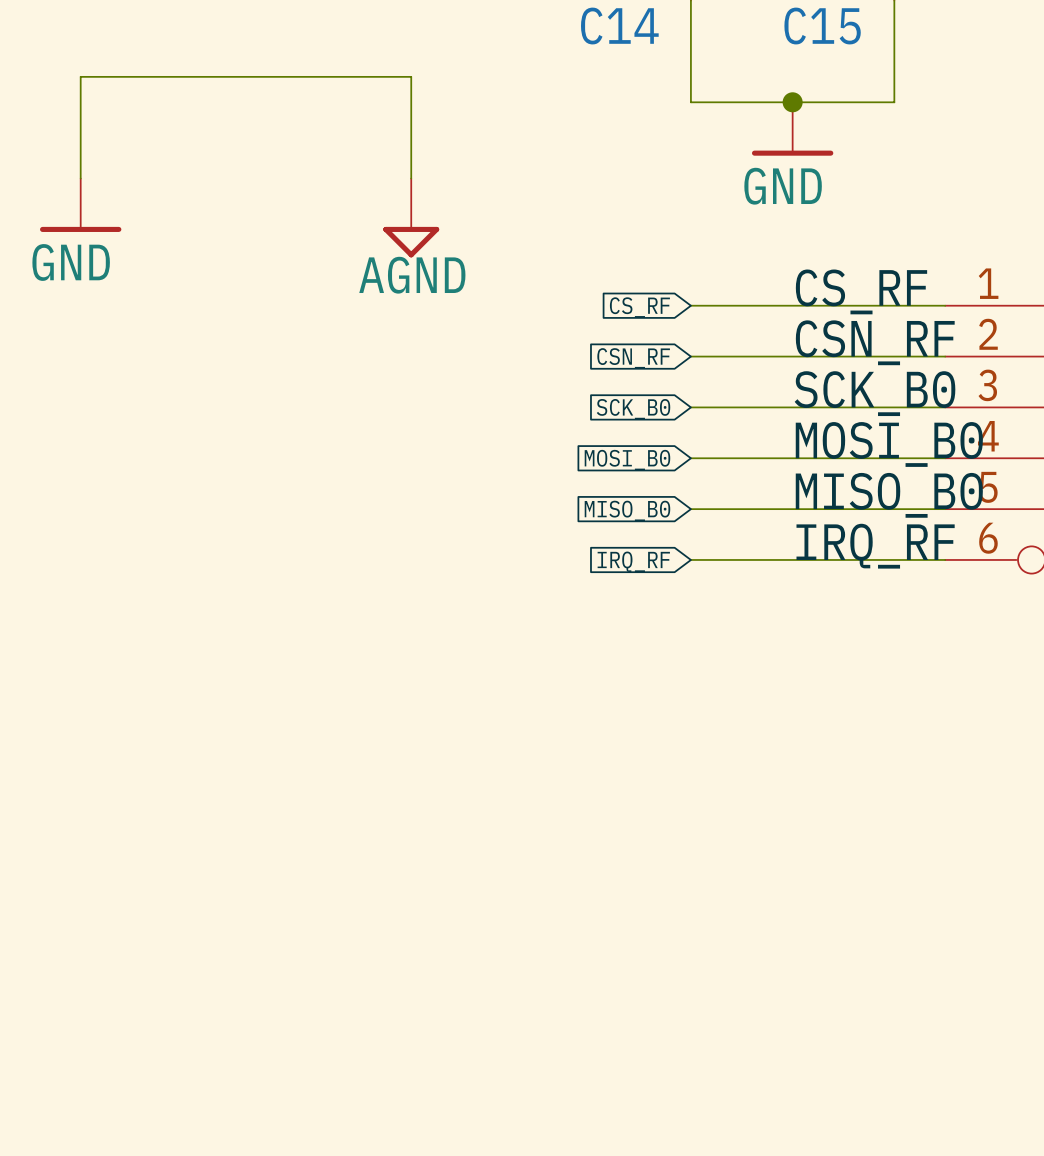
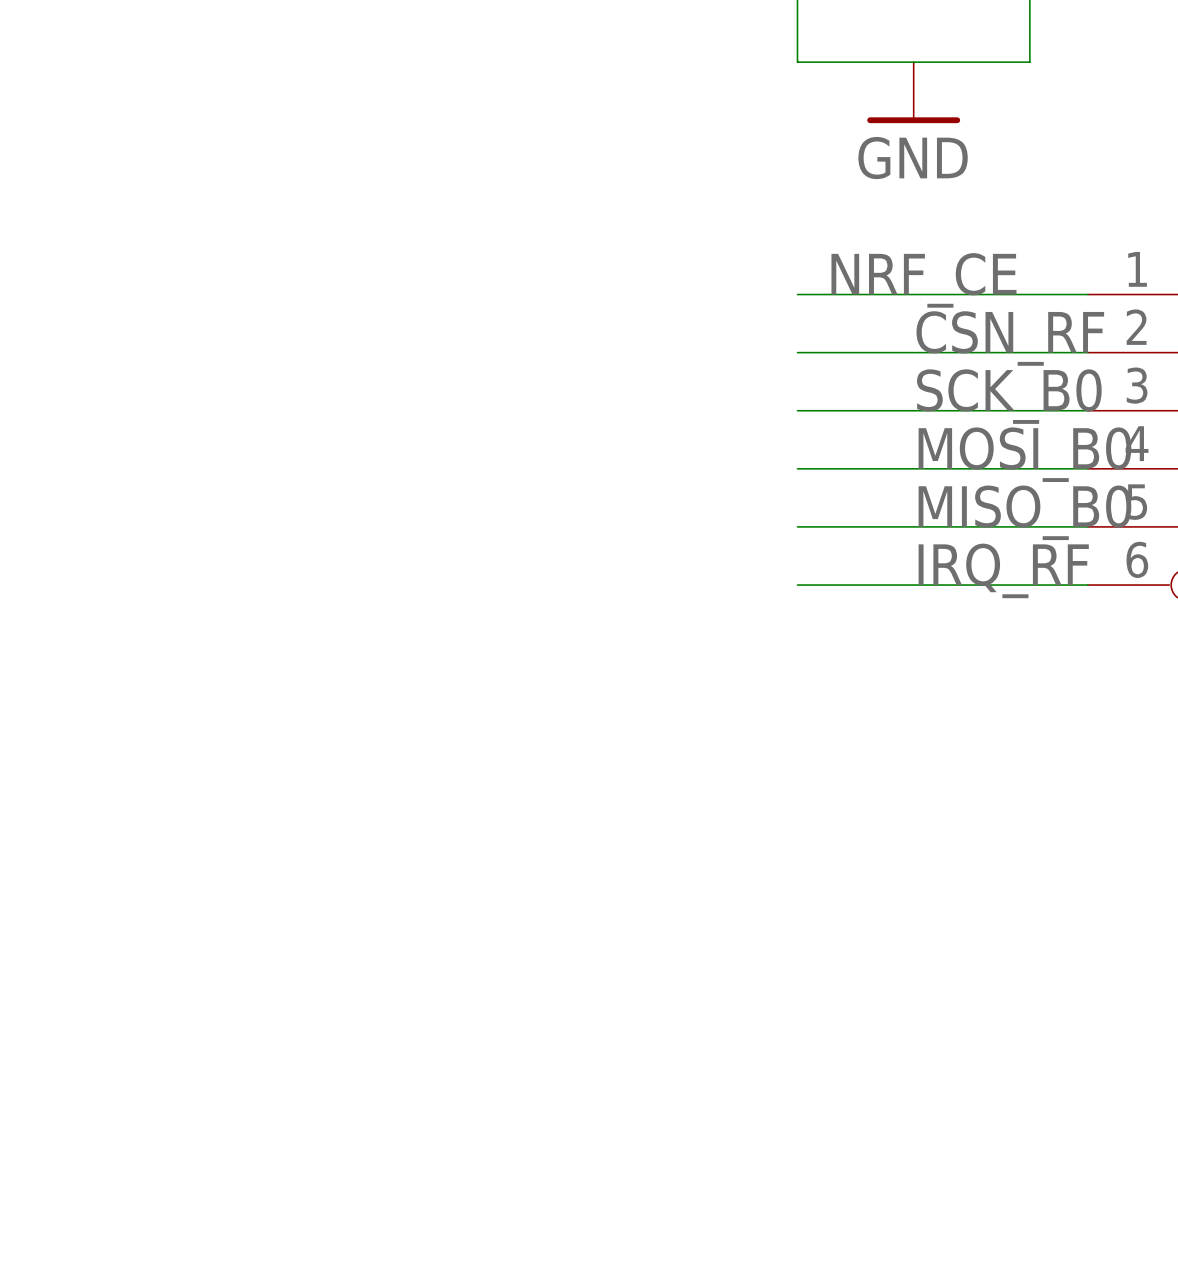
junction: (792, 102) -> none
wire: (80, 178) (80, 76) (411, 76) (411, 178) -> none
power symbol: GND (80, 205) -> none
power symbol: AGND (411, 217) -> none
label: none -> NRF_CE (923, 280)
label: CS_RF (861, 291) -> none
global label: CS_RF (639, 307) -> none
global label: CSN_RF (633, 358) -> none
global label: SCK_B0 (633, 409) -> none
global label: MOSI_B0 (627, 460) -> none
global label: MISO_B0 (627, 510) -> none
global label: IRQ_RF (633, 561) -> none

